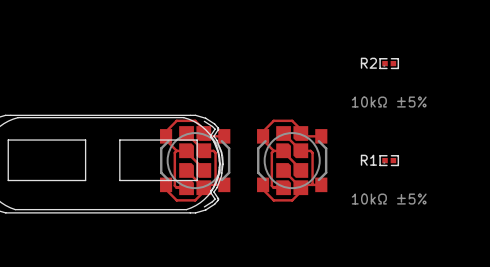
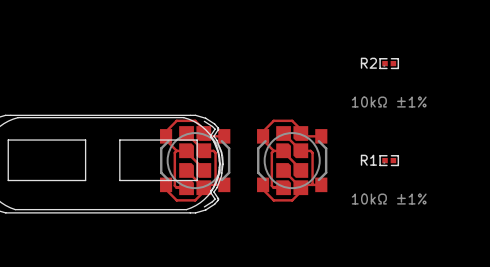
R2 value: 10kΩ ±5% (389, 102) -> 10kΩ ±1% (389, 102)
R1 value: 10kΩ ±5% (389, 199) -> 10kΩ ±1% (389, 199)

